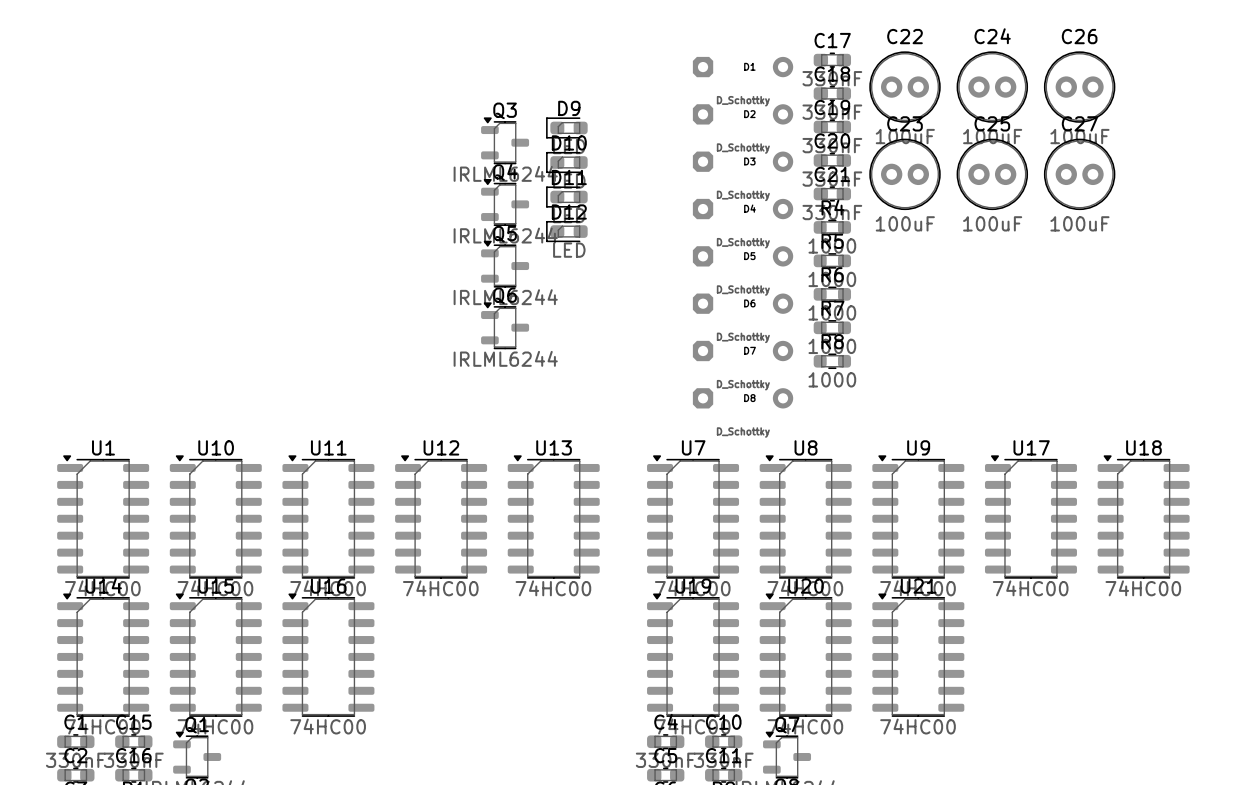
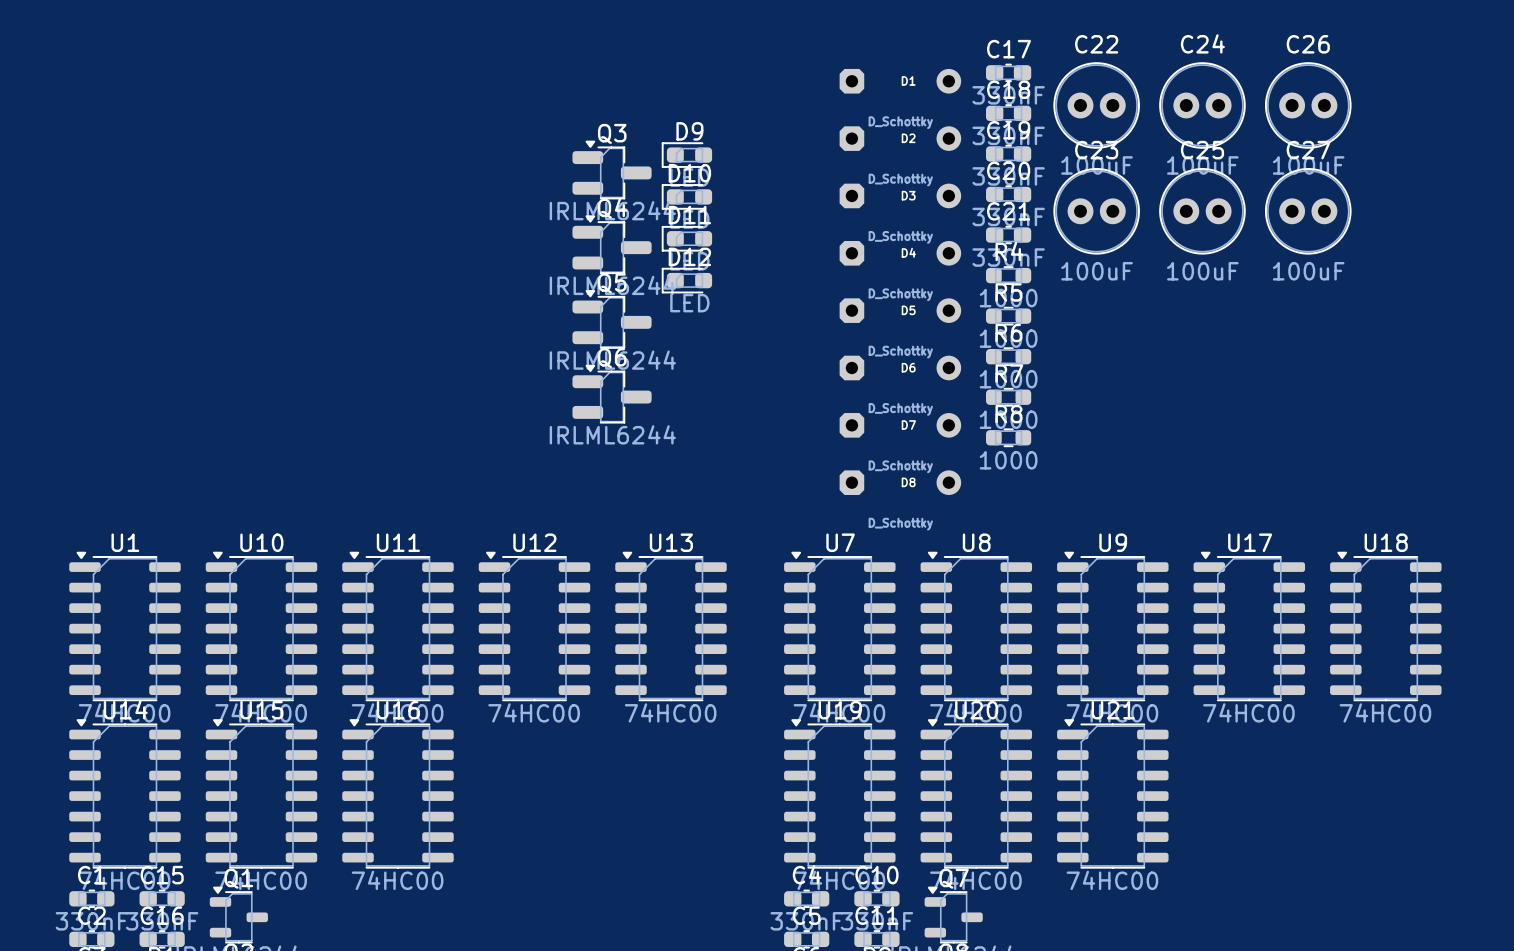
Q3 footprint: [481, 117, 530, 165] -> [572, 140, 652, 200]
Q4 footprint: [481, 179, 530, 226] -> [572, 215, 652, 275]
Q5 footprint: [481, 240, 530, 288] -> [572, 290, 652, 349]
Q6 footprint: [481, 302, 530, 350] -> [572, 364, 652, 424]

